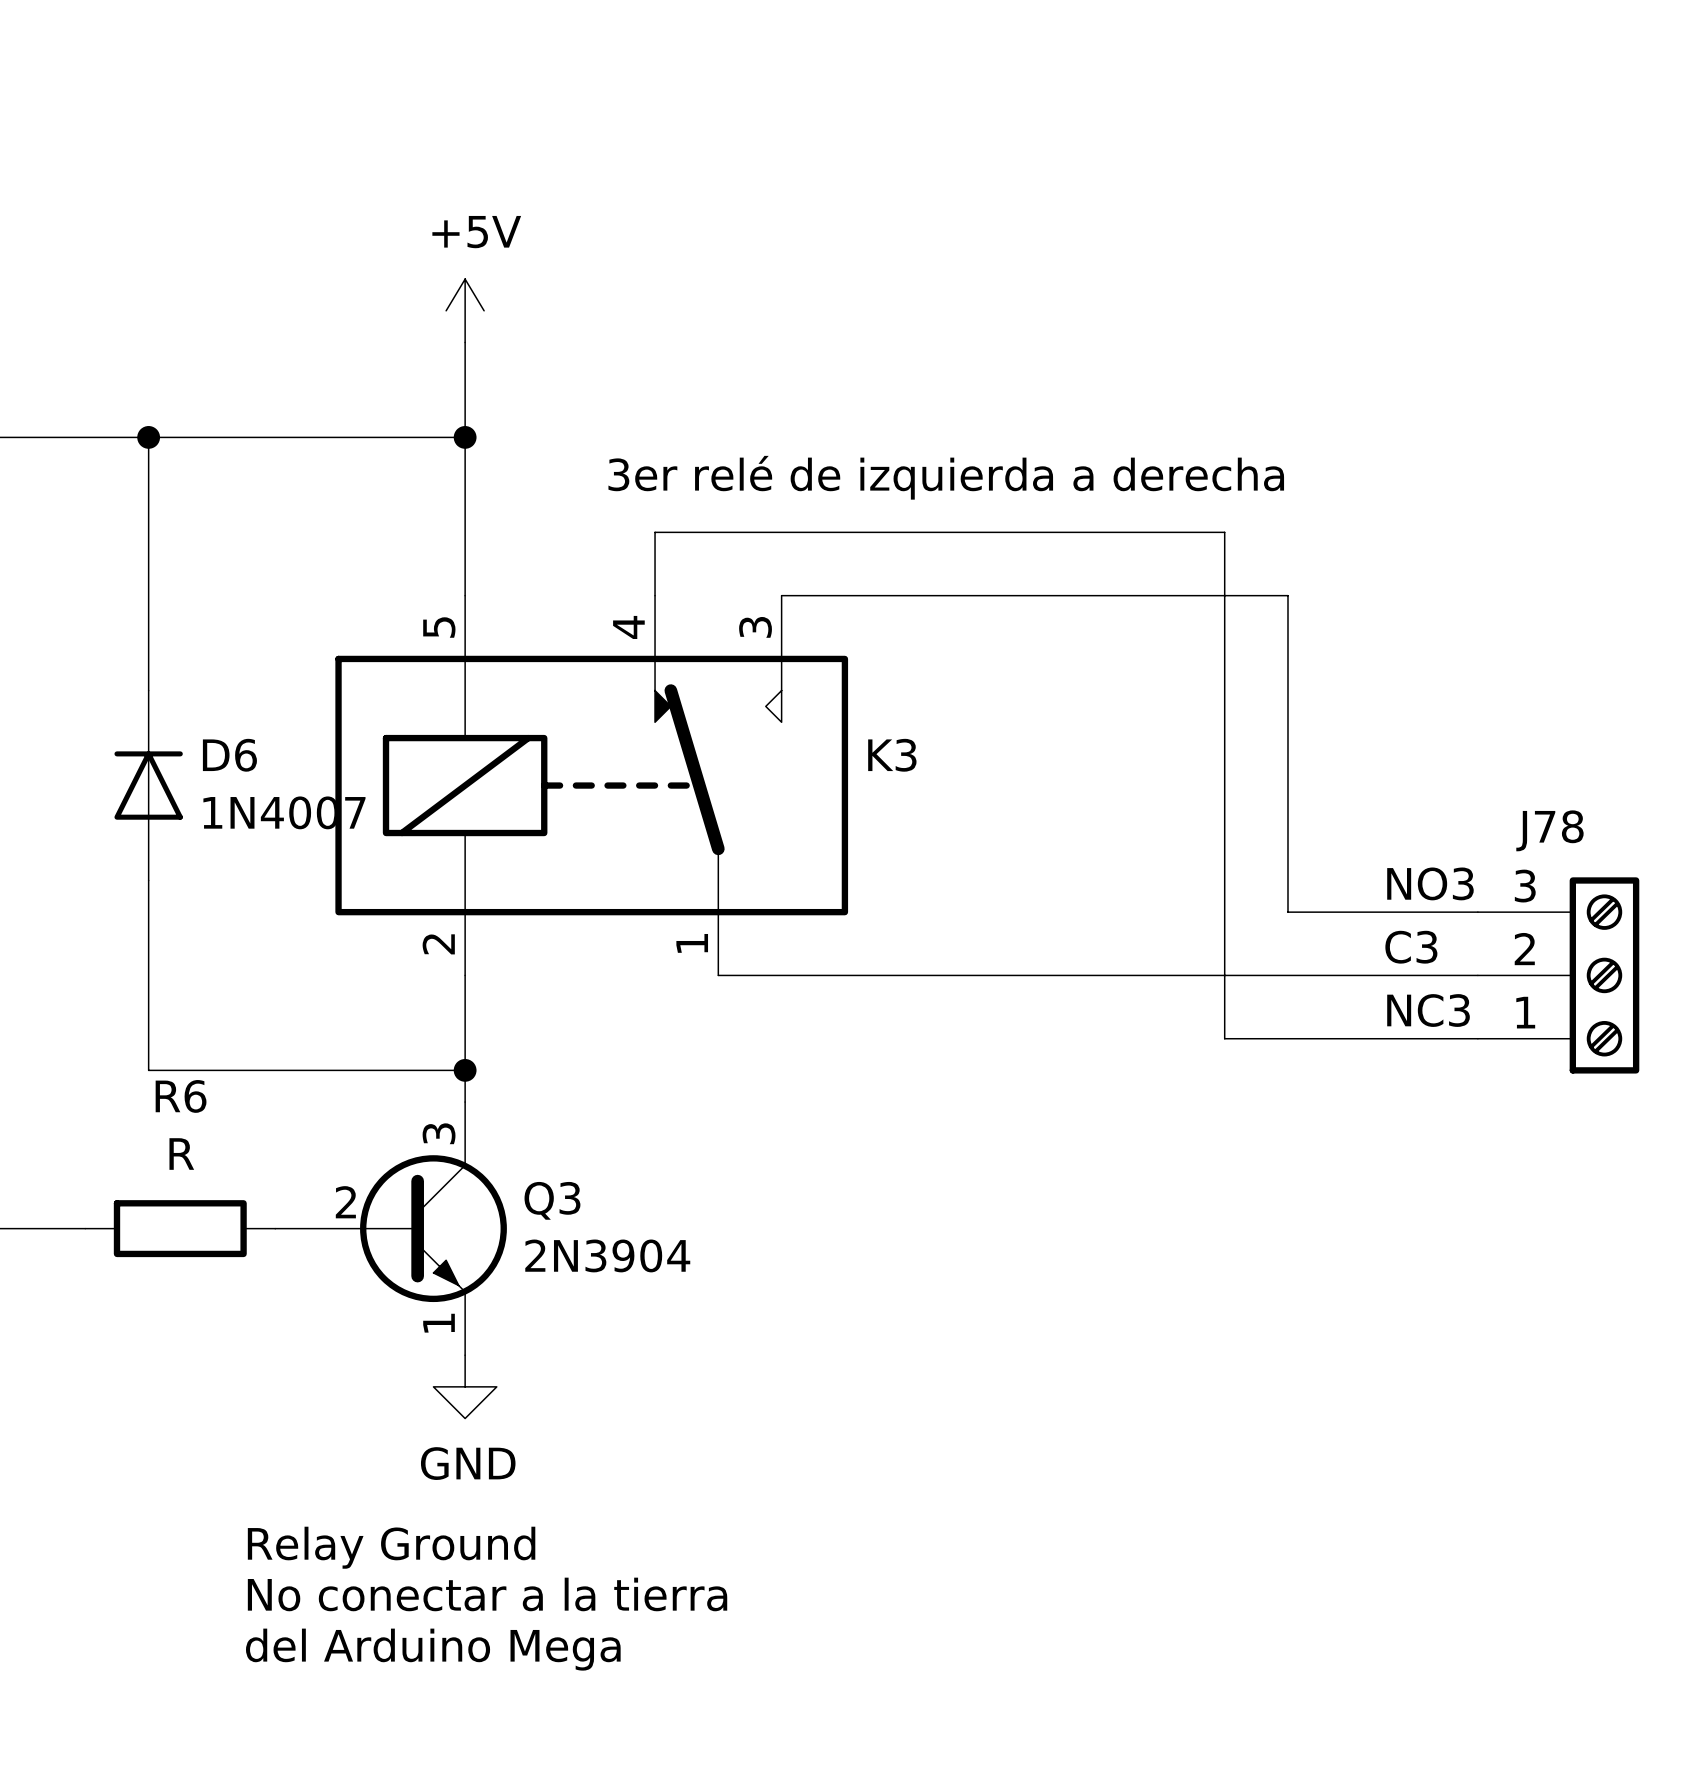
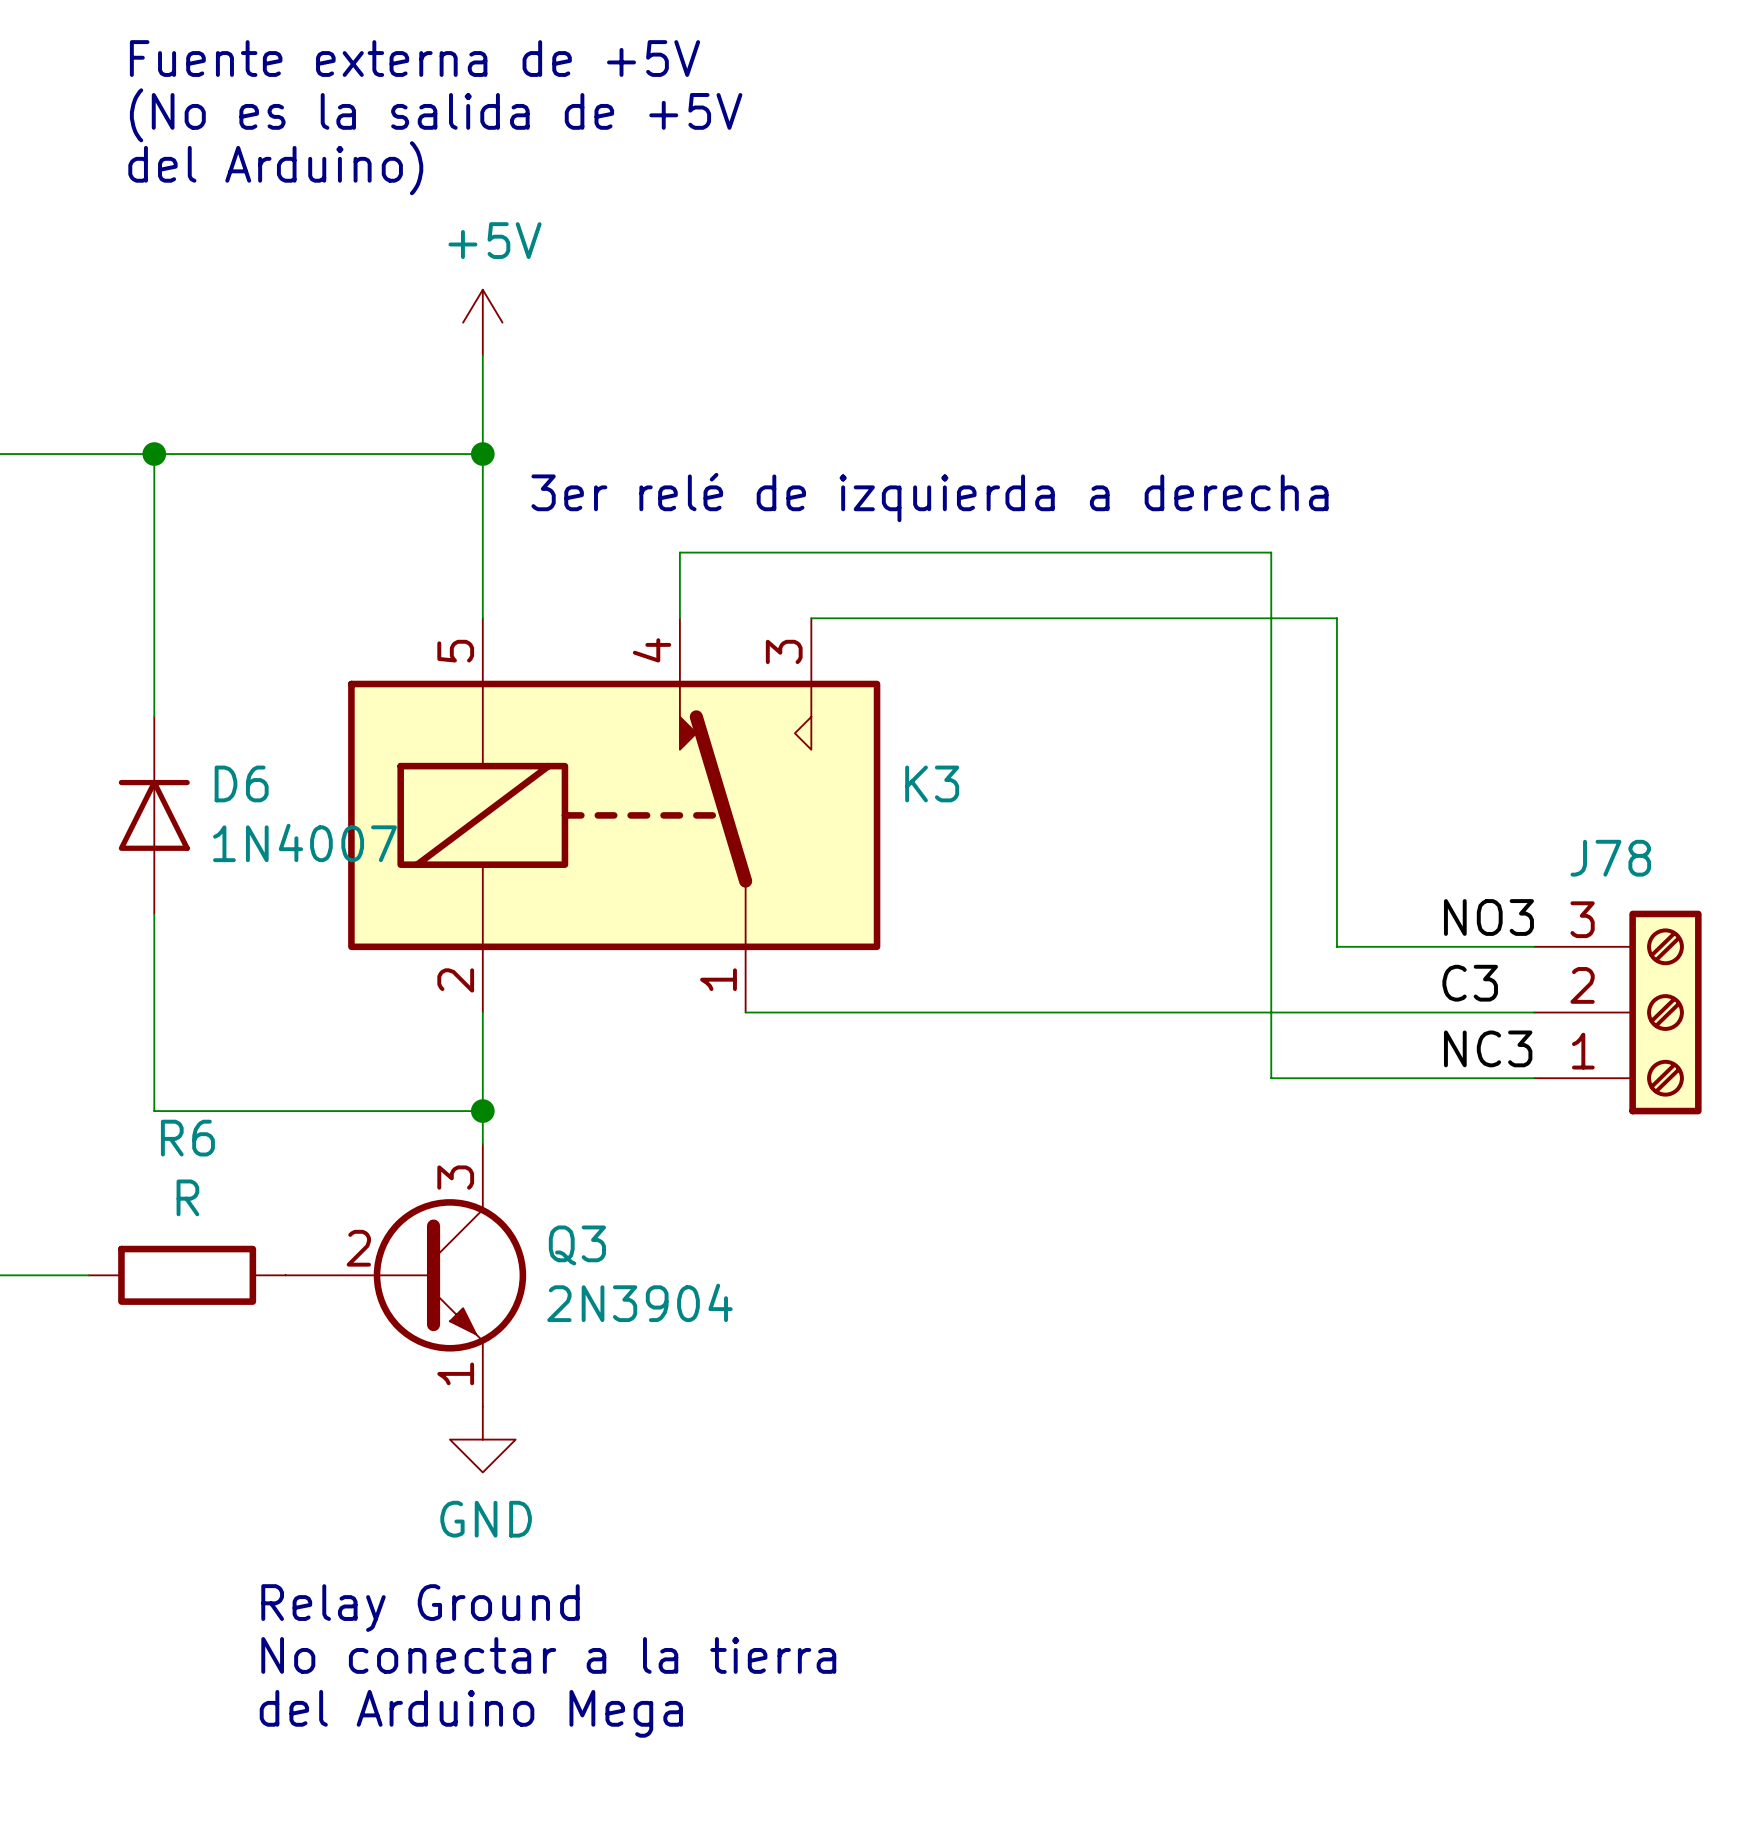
text: none -> Fuente externa de +5V (415, 58)
text: none -> (No es la salida de +5V (436, 115)
text: none -> del Arduino) (275, 168)

